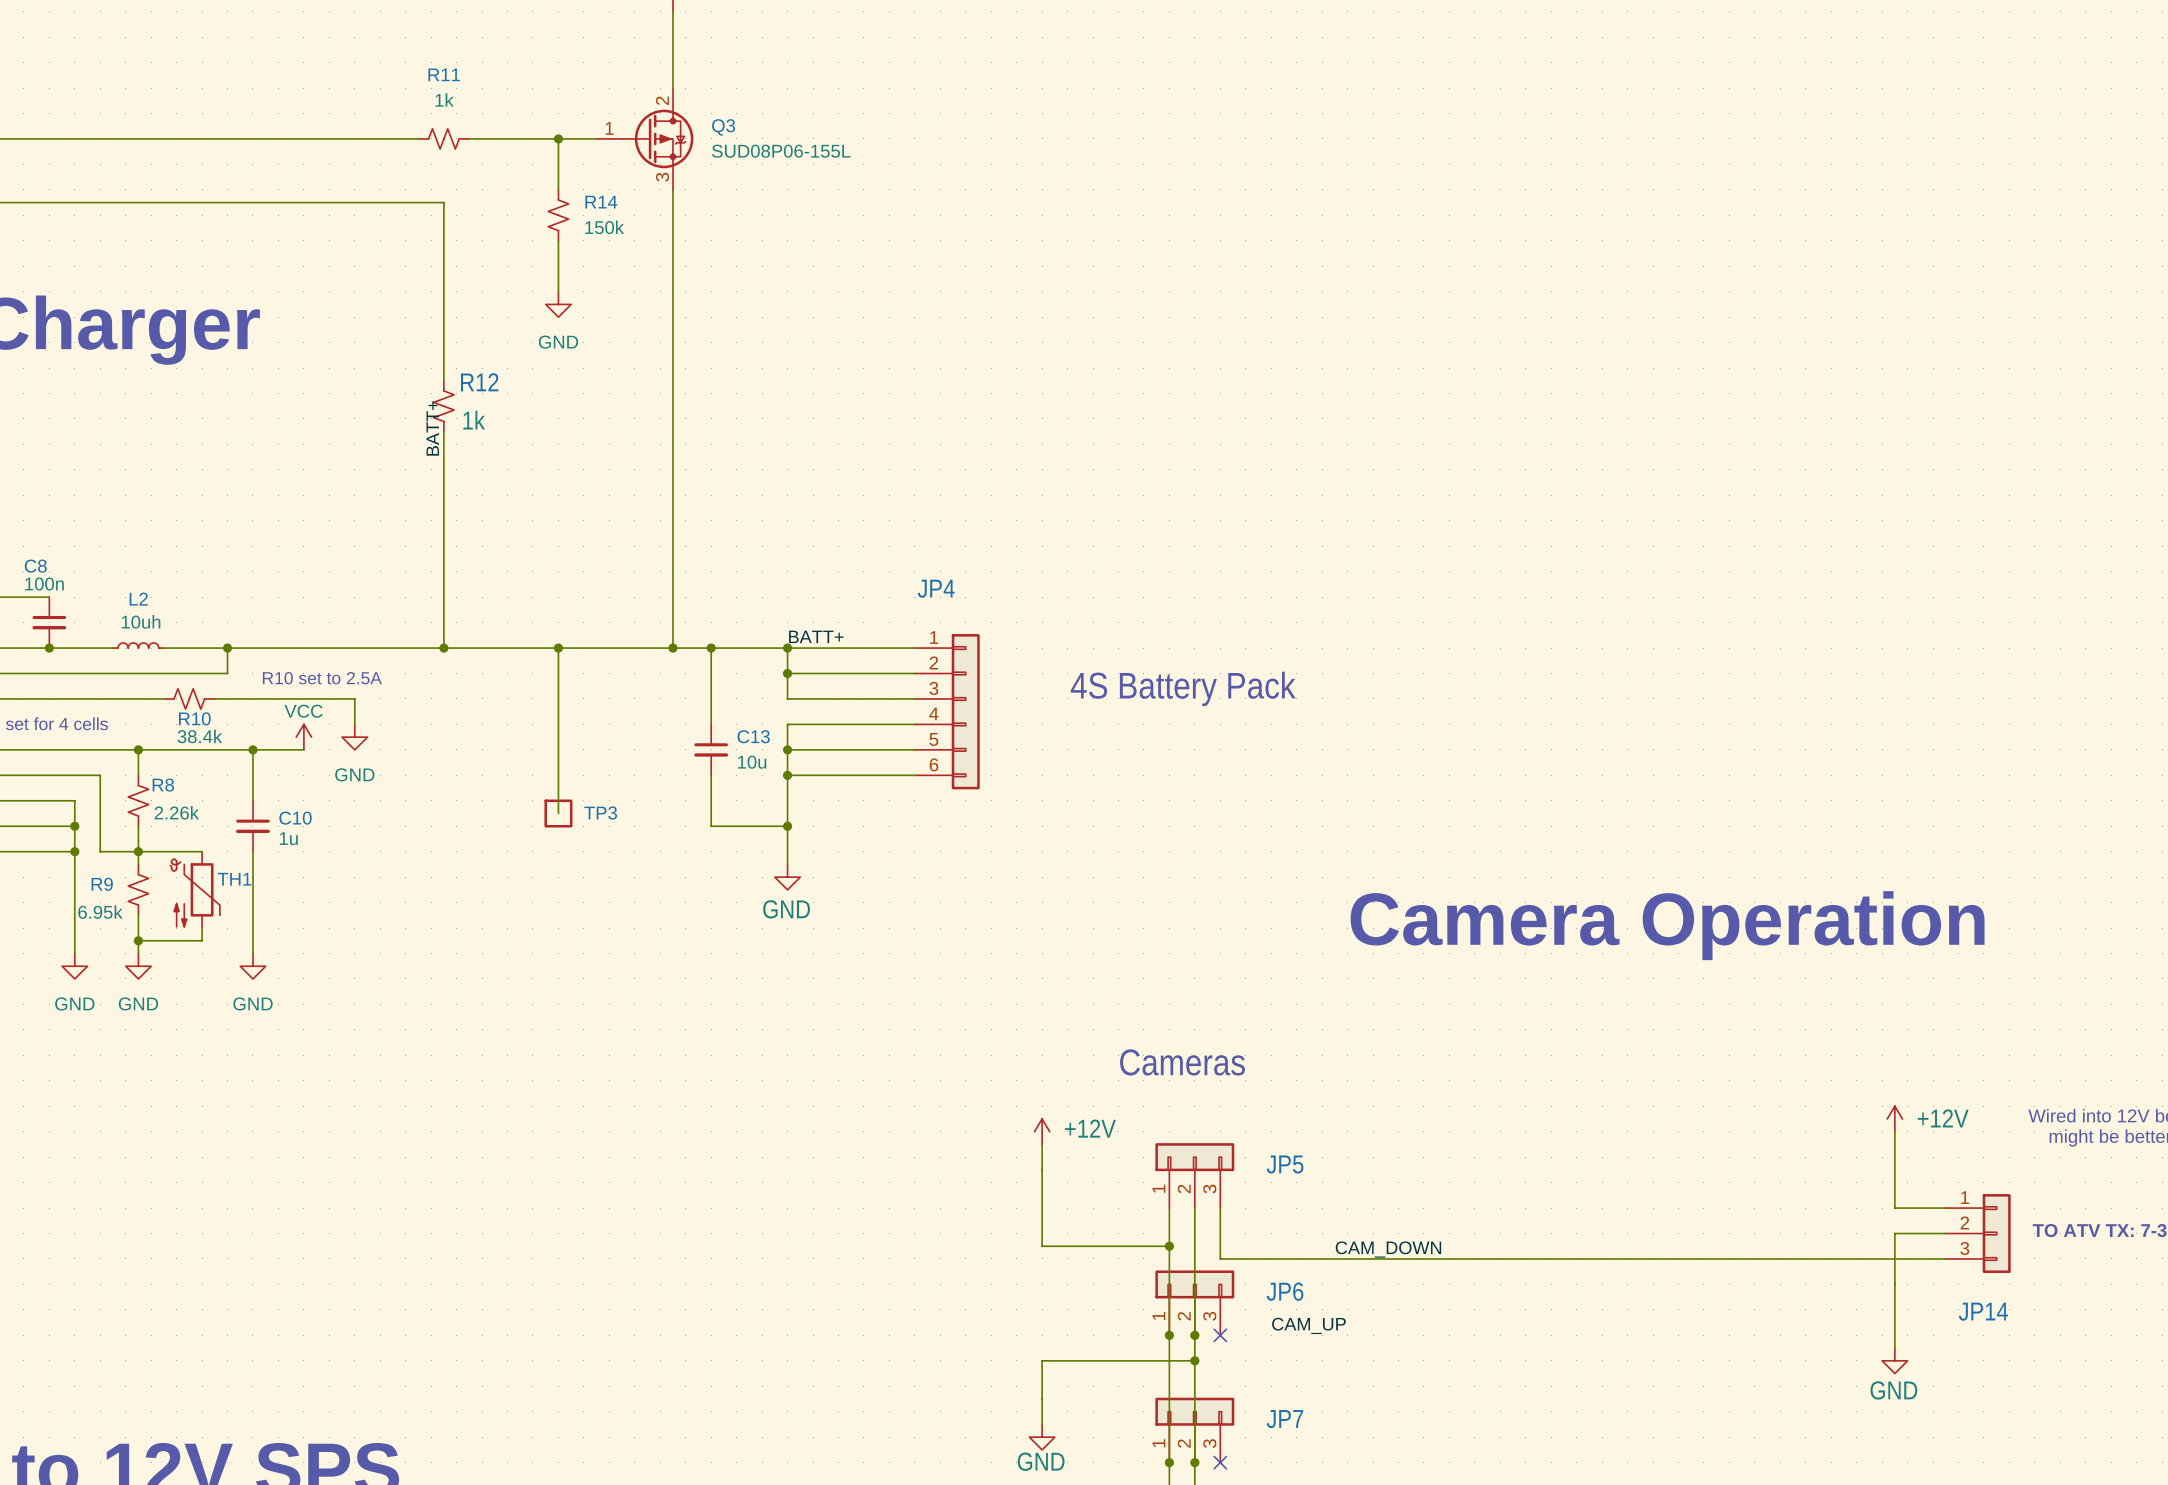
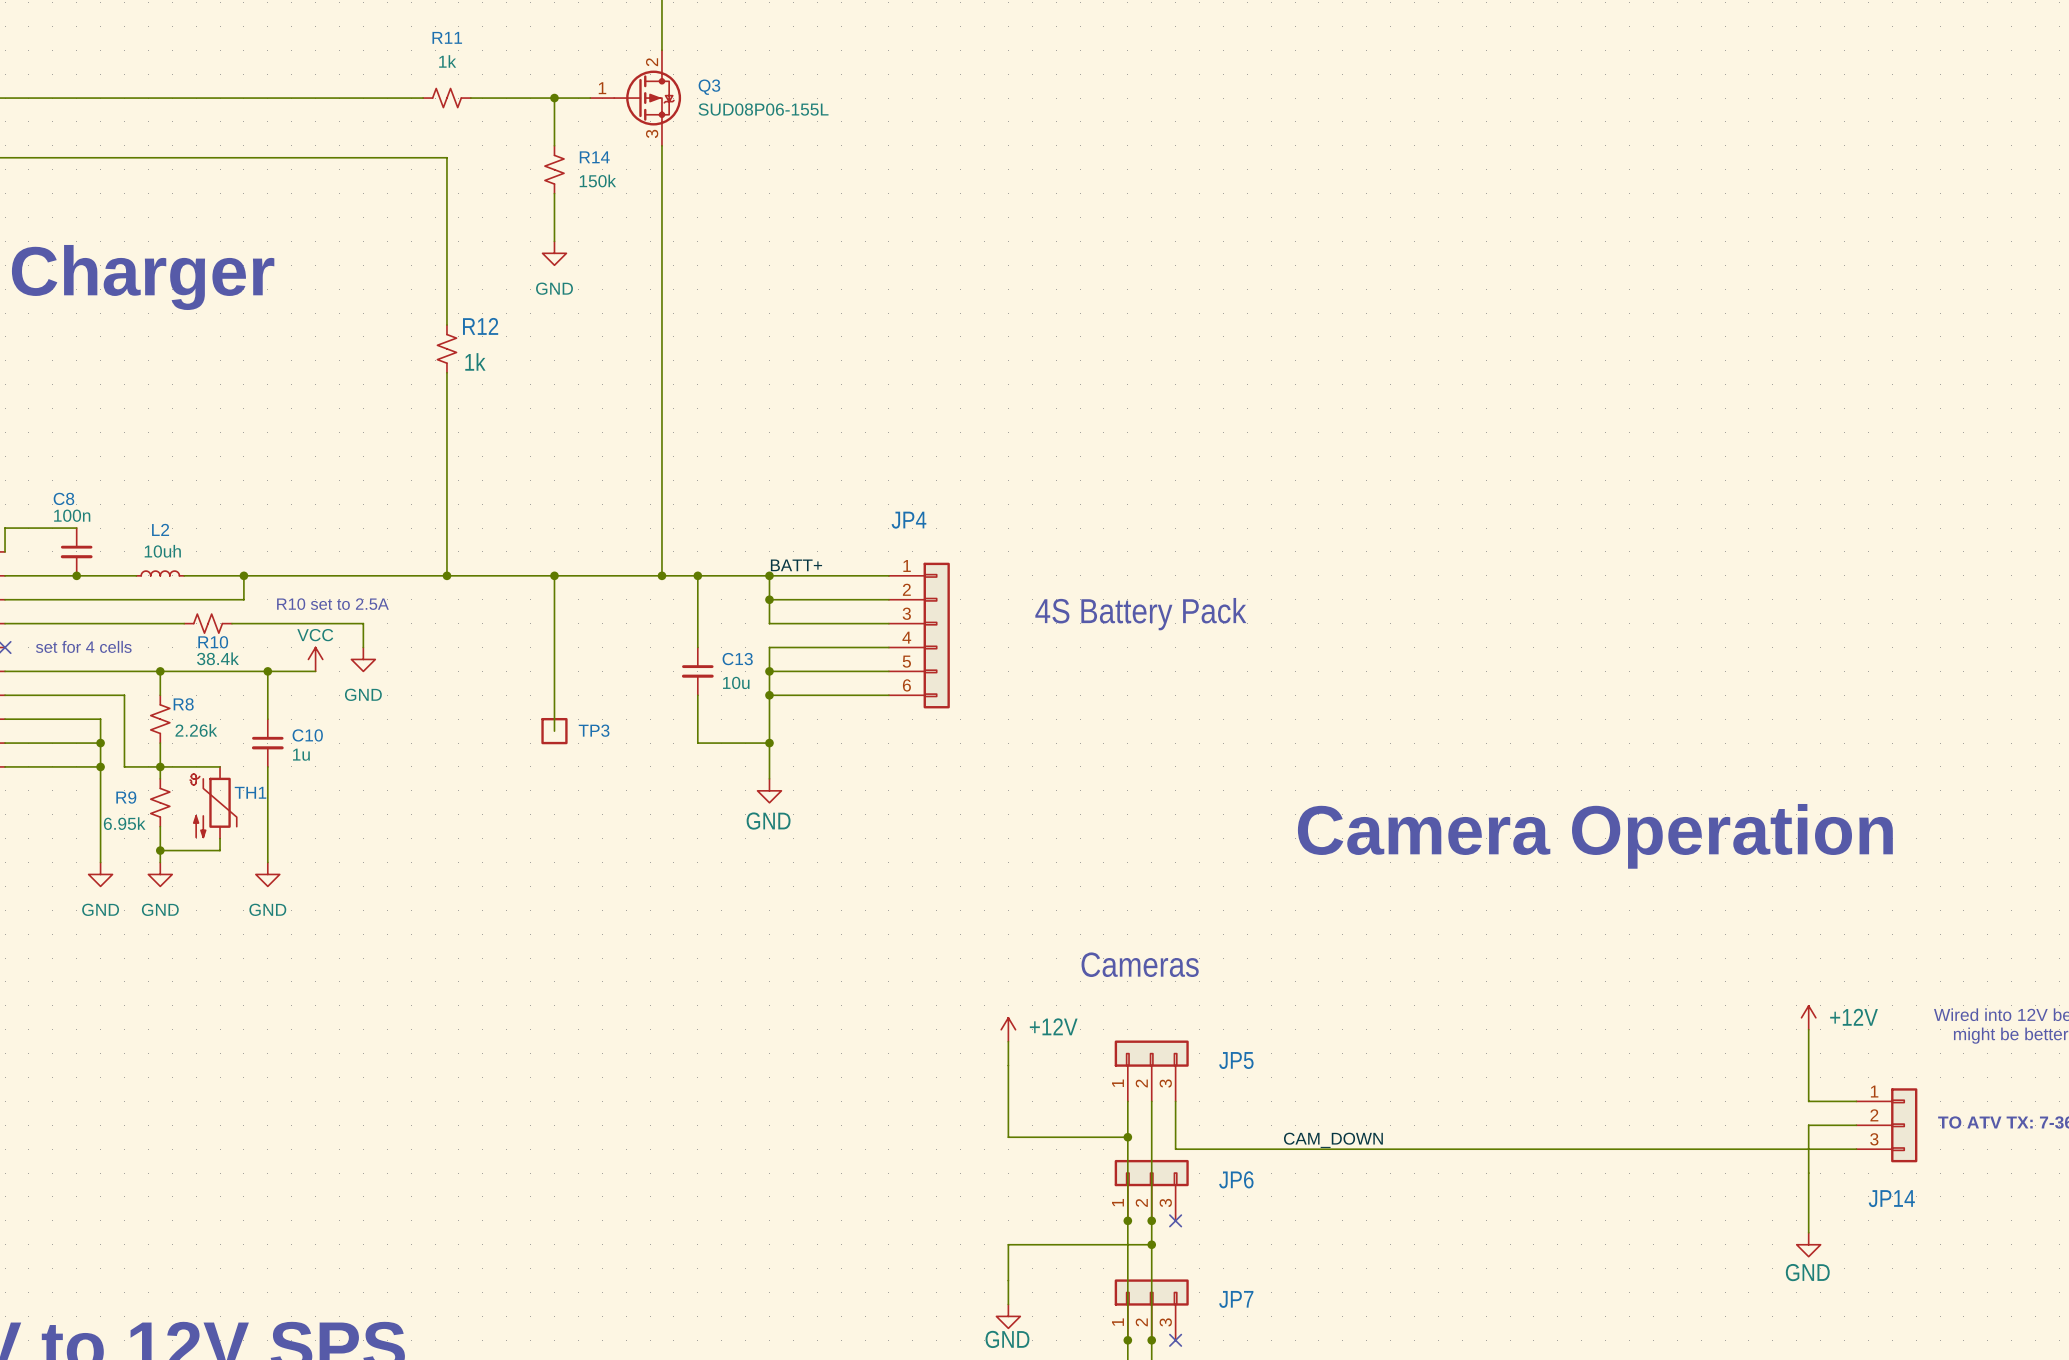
label: BATT+ (432, 428) -> none
label: CAM_UP (1308, 1325) -> none

